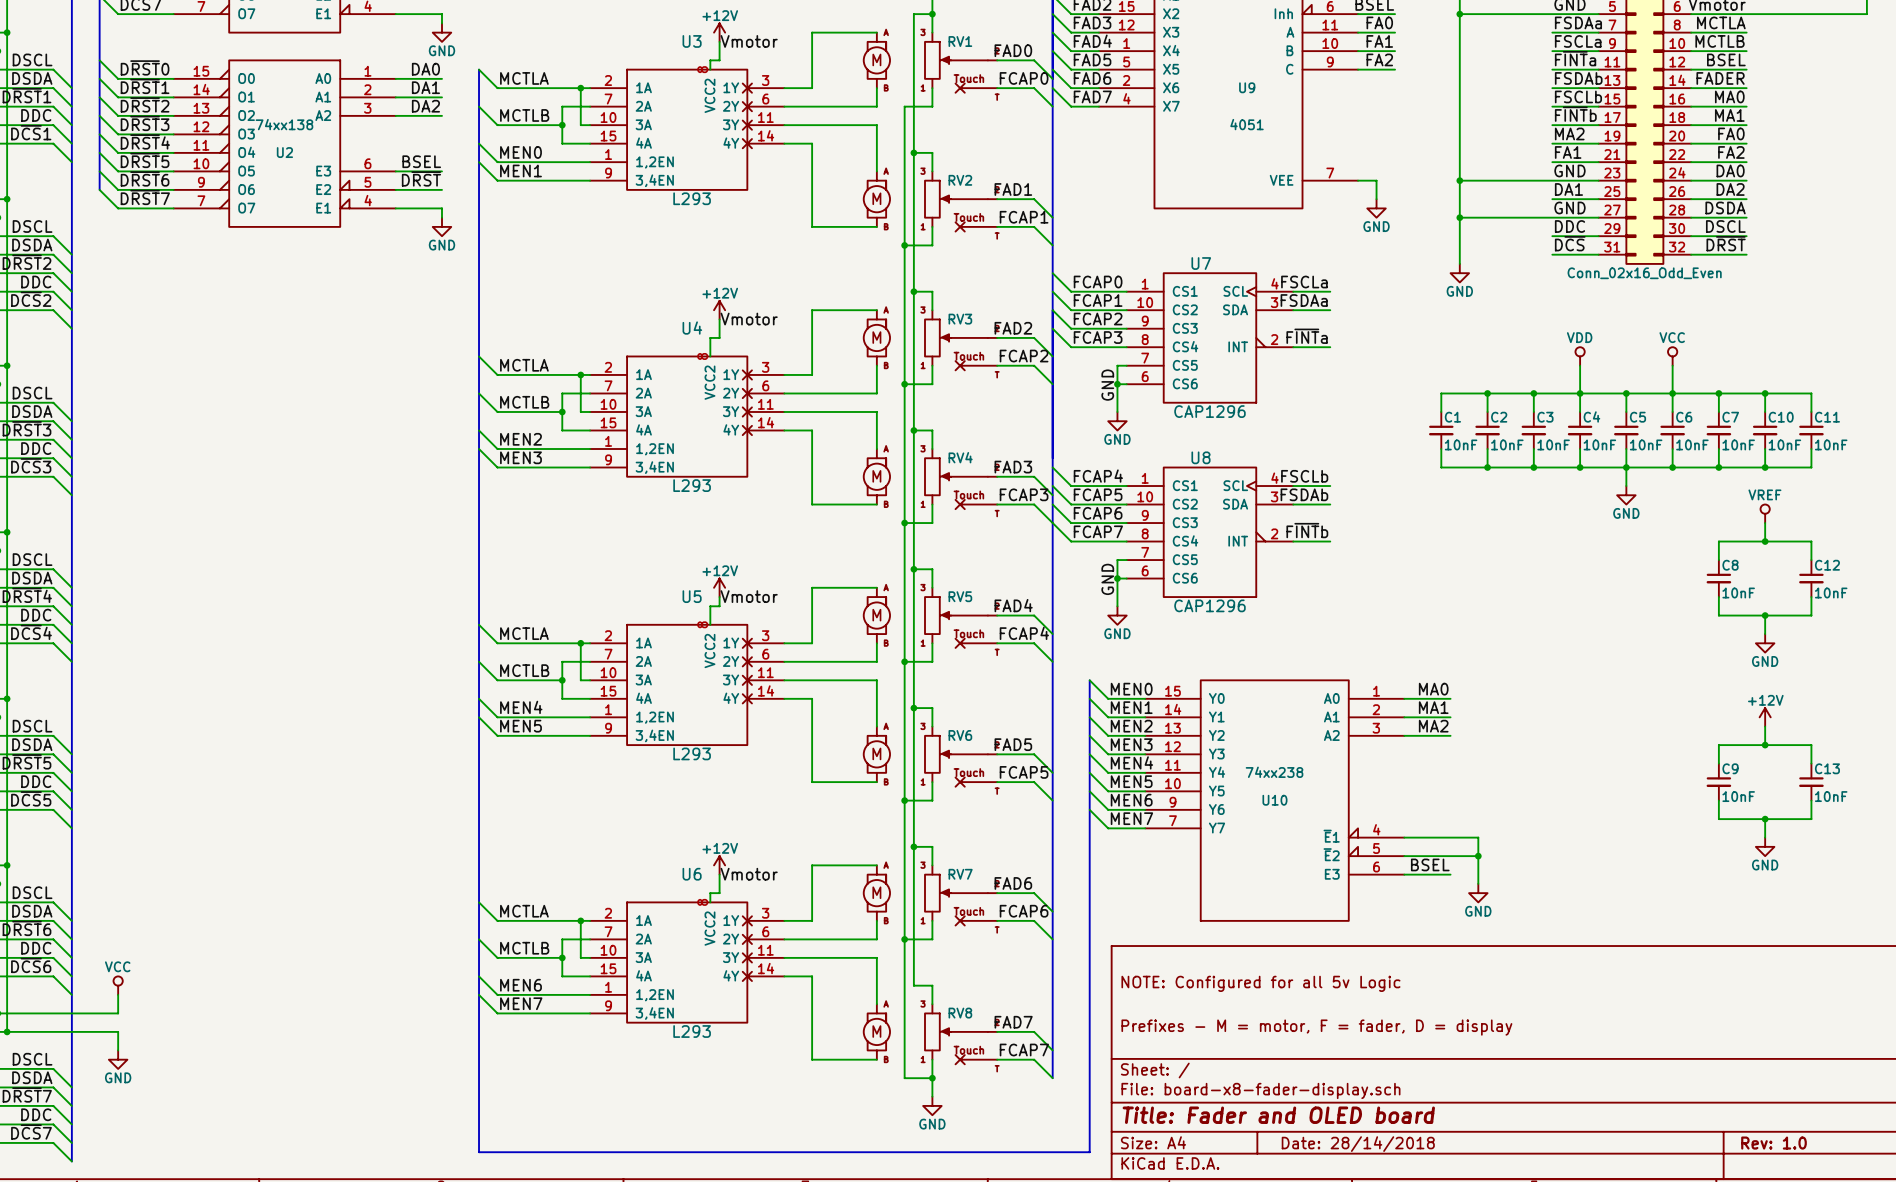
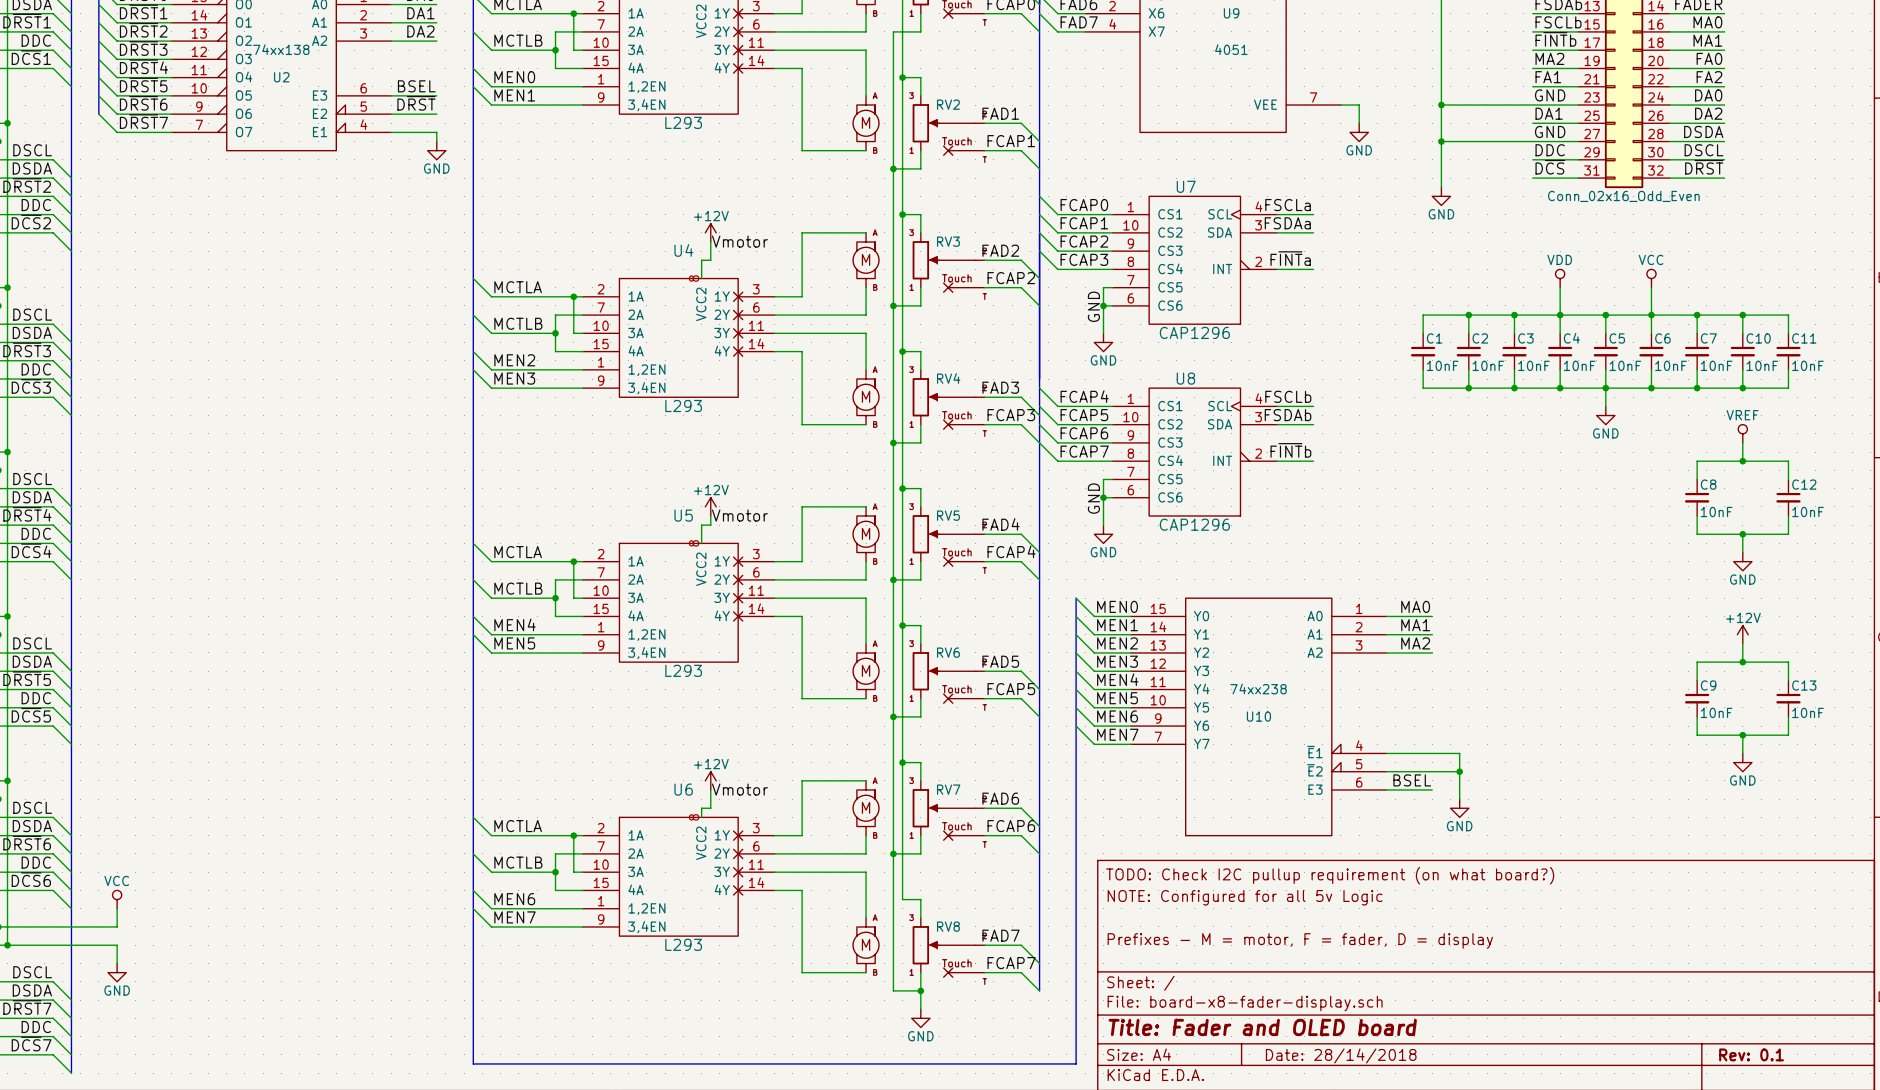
title block: none -> TODO: Check I2C pullup requirement (on what board?) (1330, 875)
title block: Rev: 1.0 (1774, 1143) -> Rev: 0.1 (1751, 1054)

